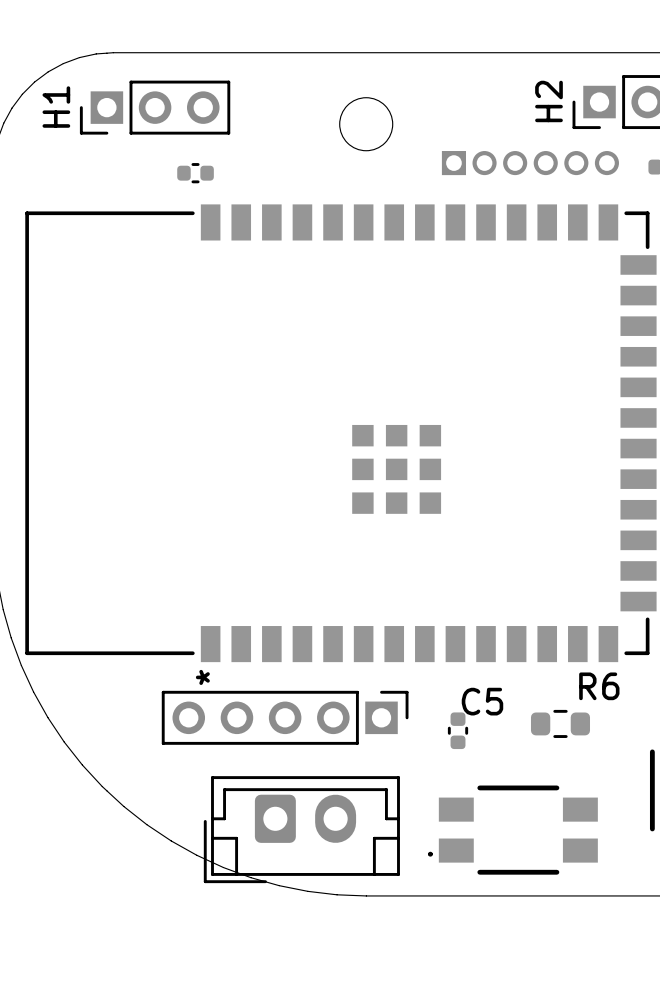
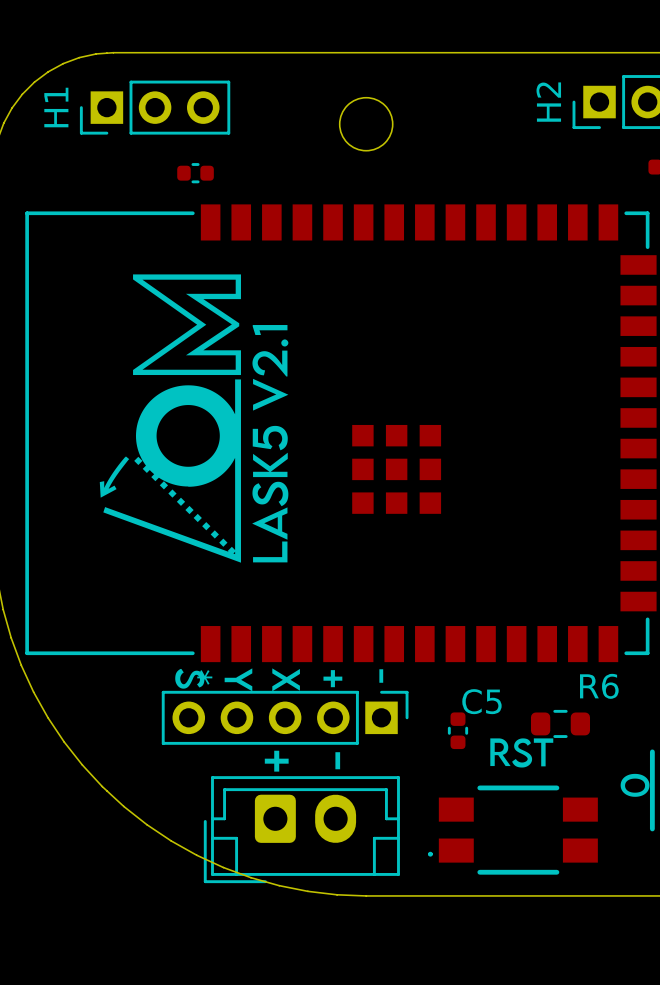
part: (530, 163) -> none
drawing: none -> [99, 274, 289, 563]
drawing: none -> [175, 668, 343, 692]
drawing: none -> [379, 669, 384, 683]
drawing: none -> [490, 738, 554, 768]
drawing: none -> [264, 750, 289, 772]
drawing: none -> [335, 752, 341, 770]
drawing: none -> [620, 773, 650, 797]

